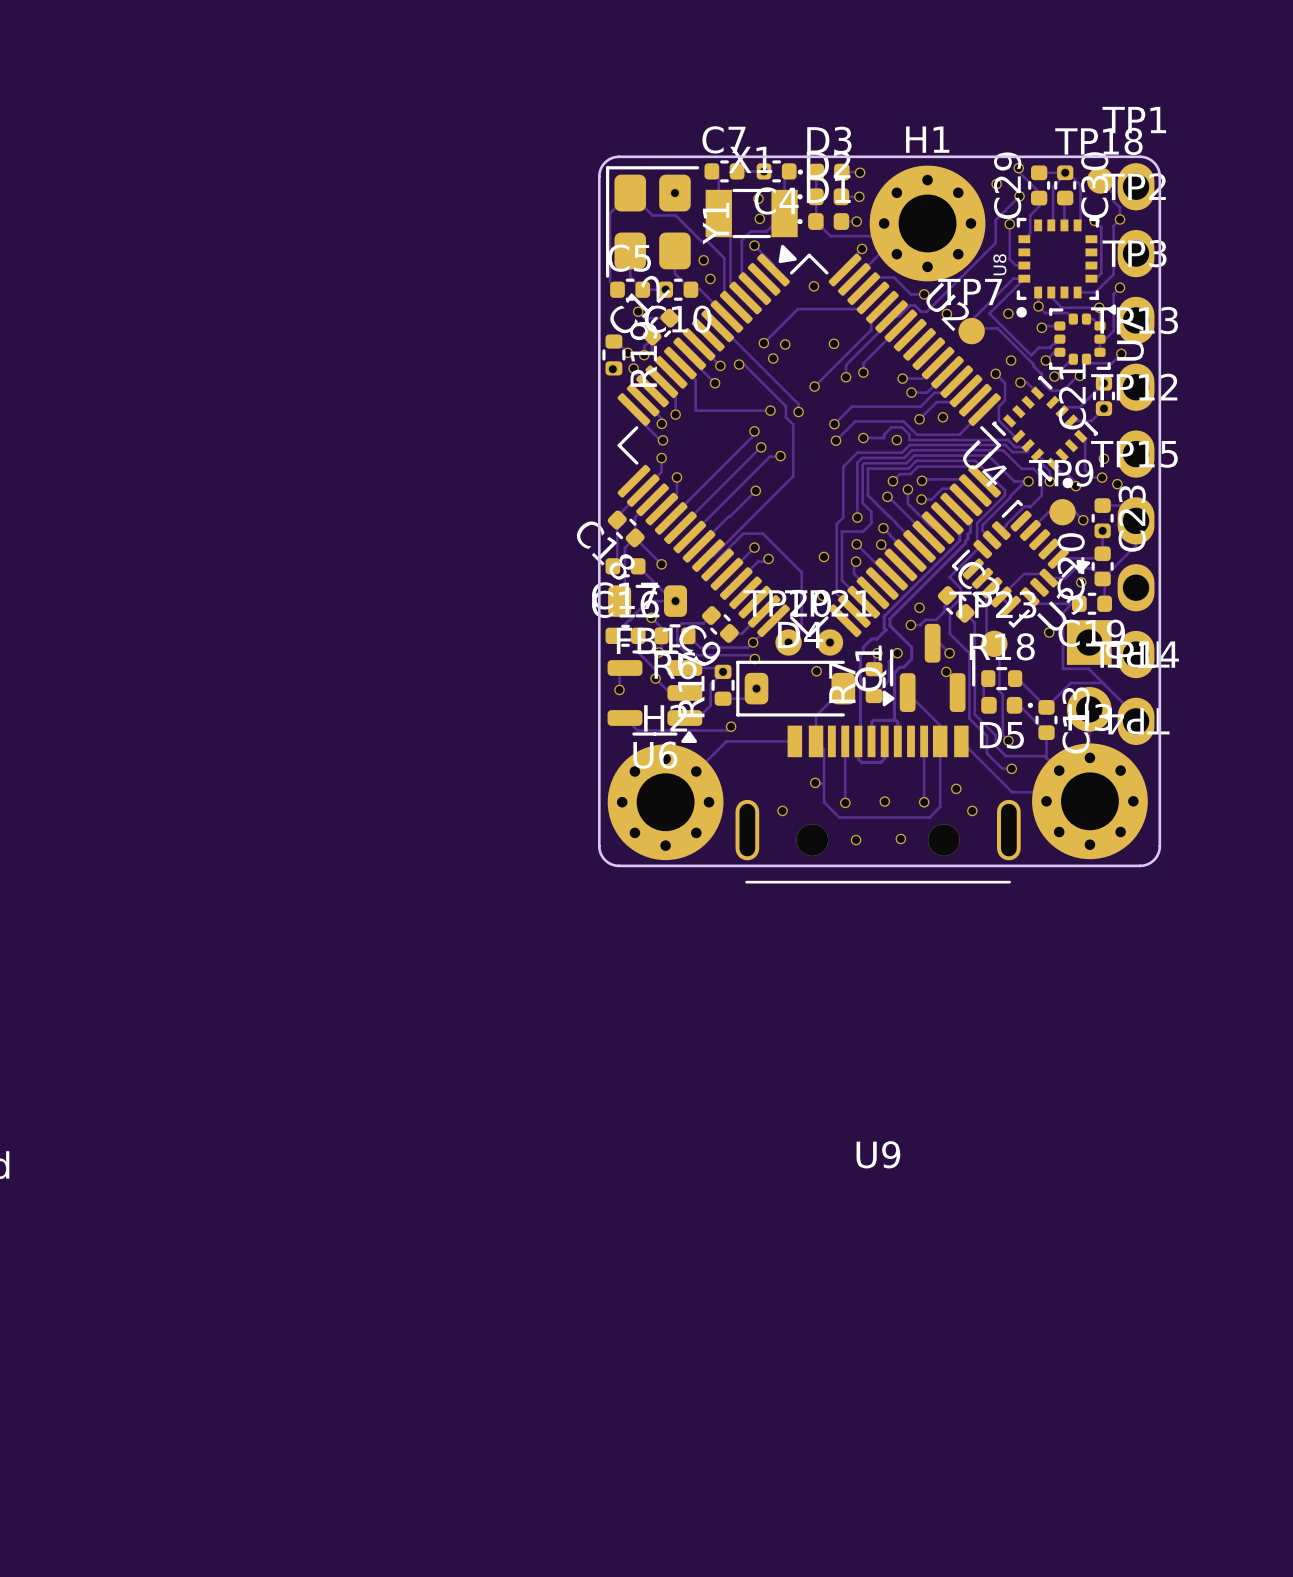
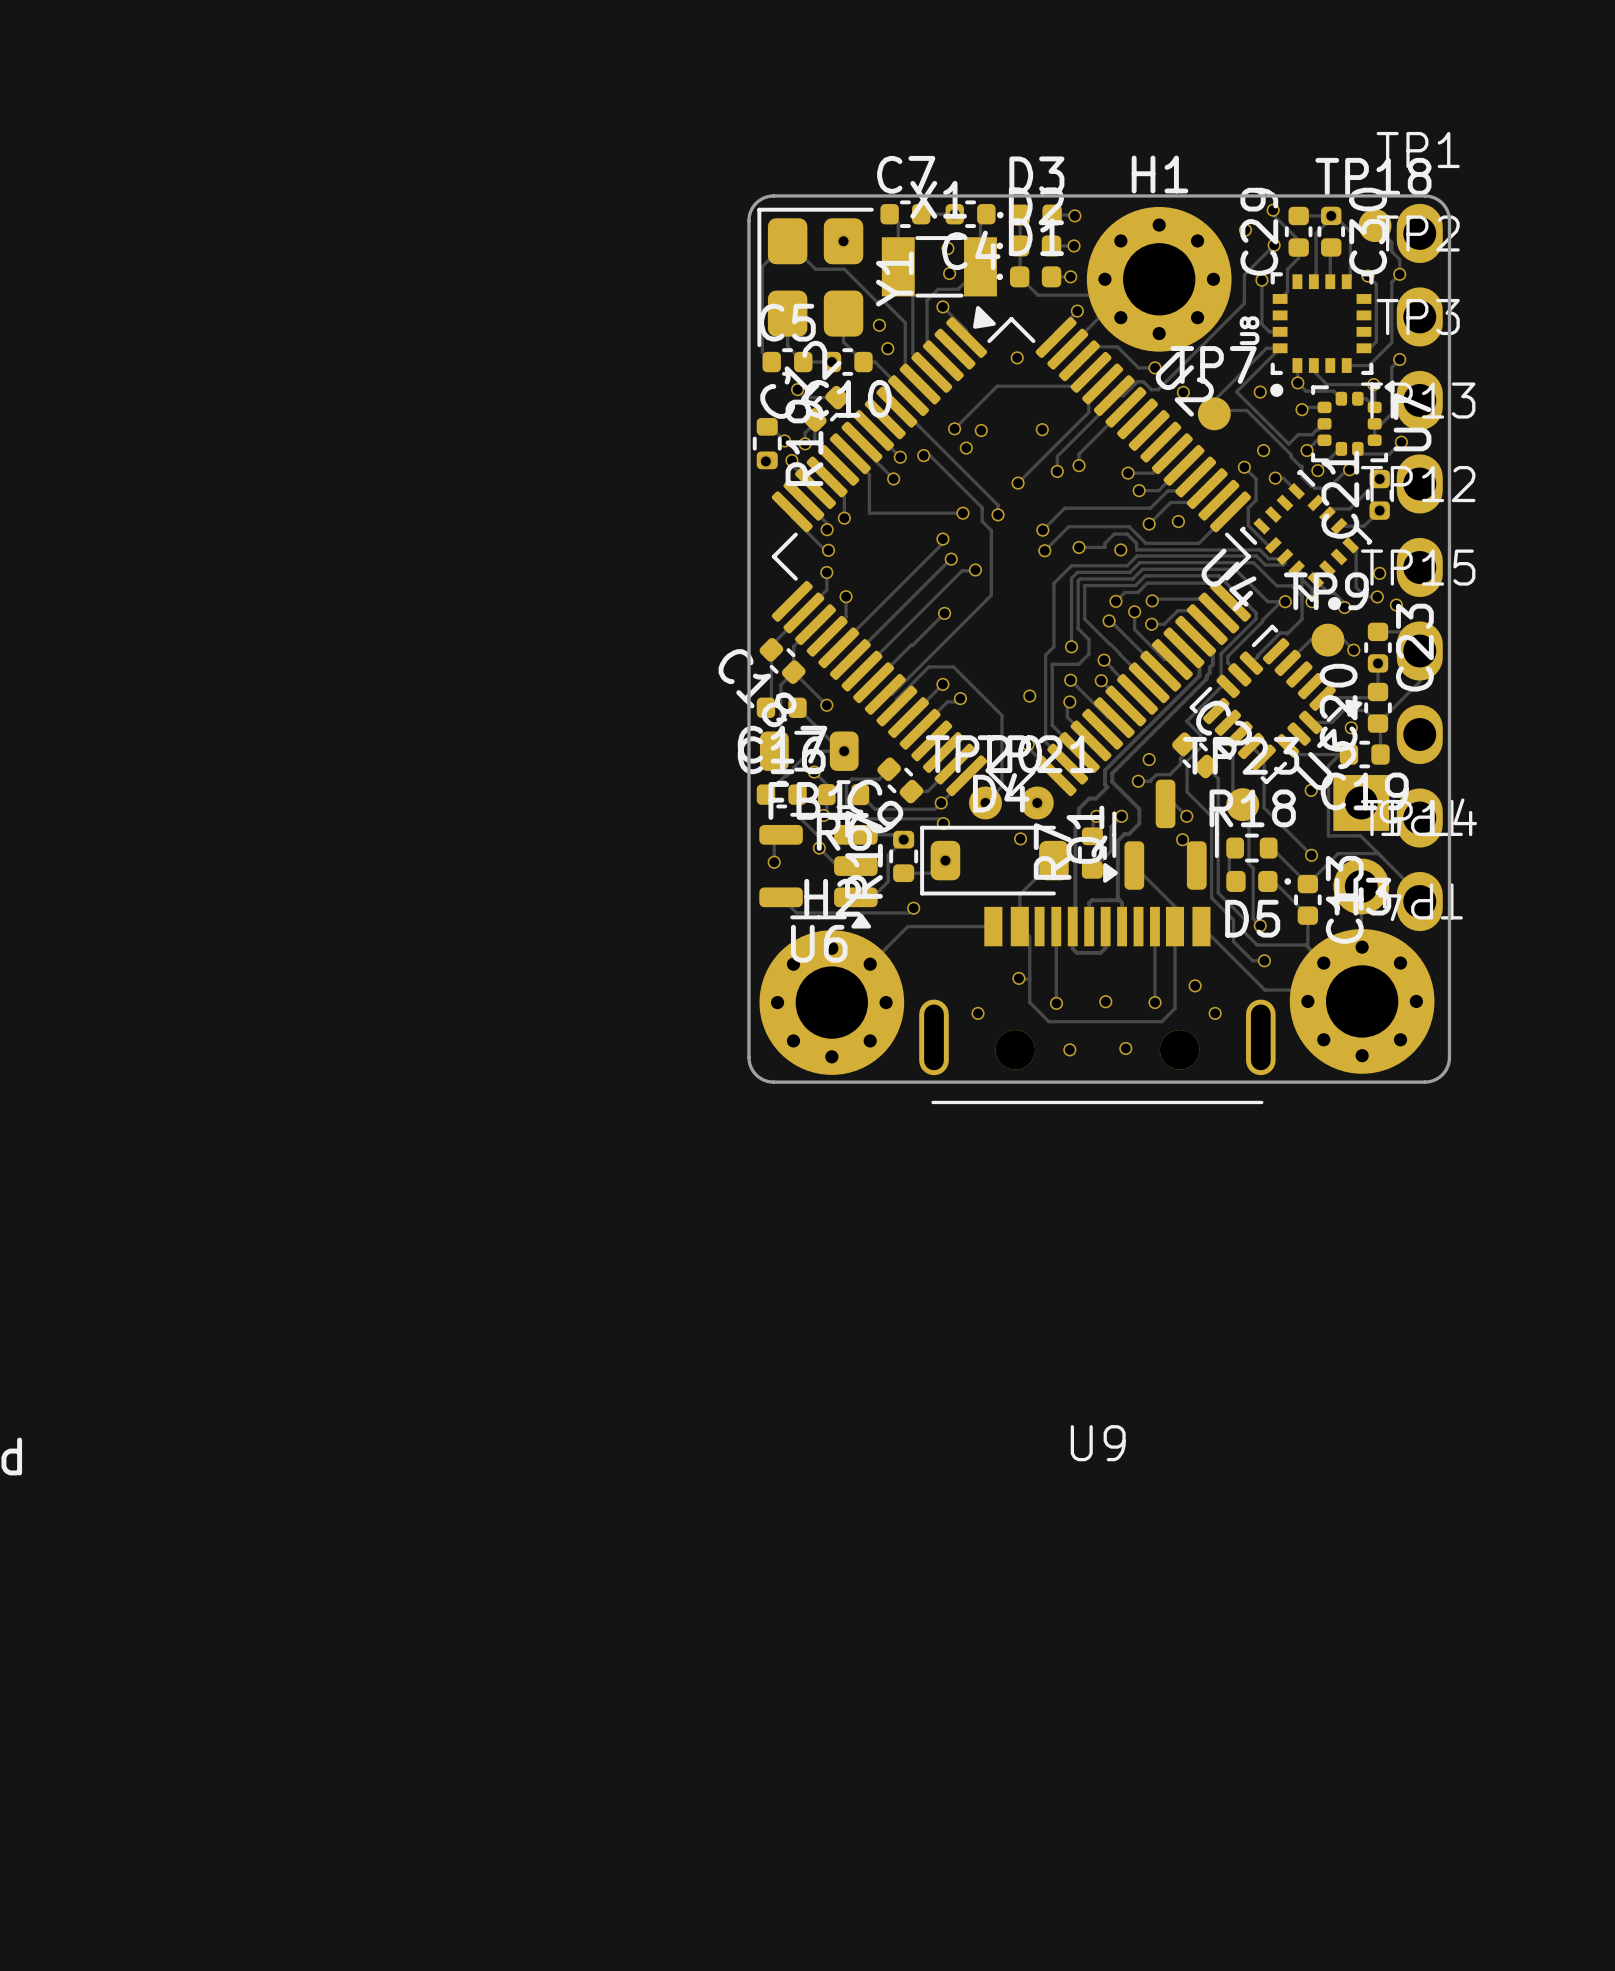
track: (1044, 573) (1024, 573) (1001, 596) -> none
track: none -> (1262, 757) (1264, 807) (1311, 855)
via: none -> (1311, 855)

